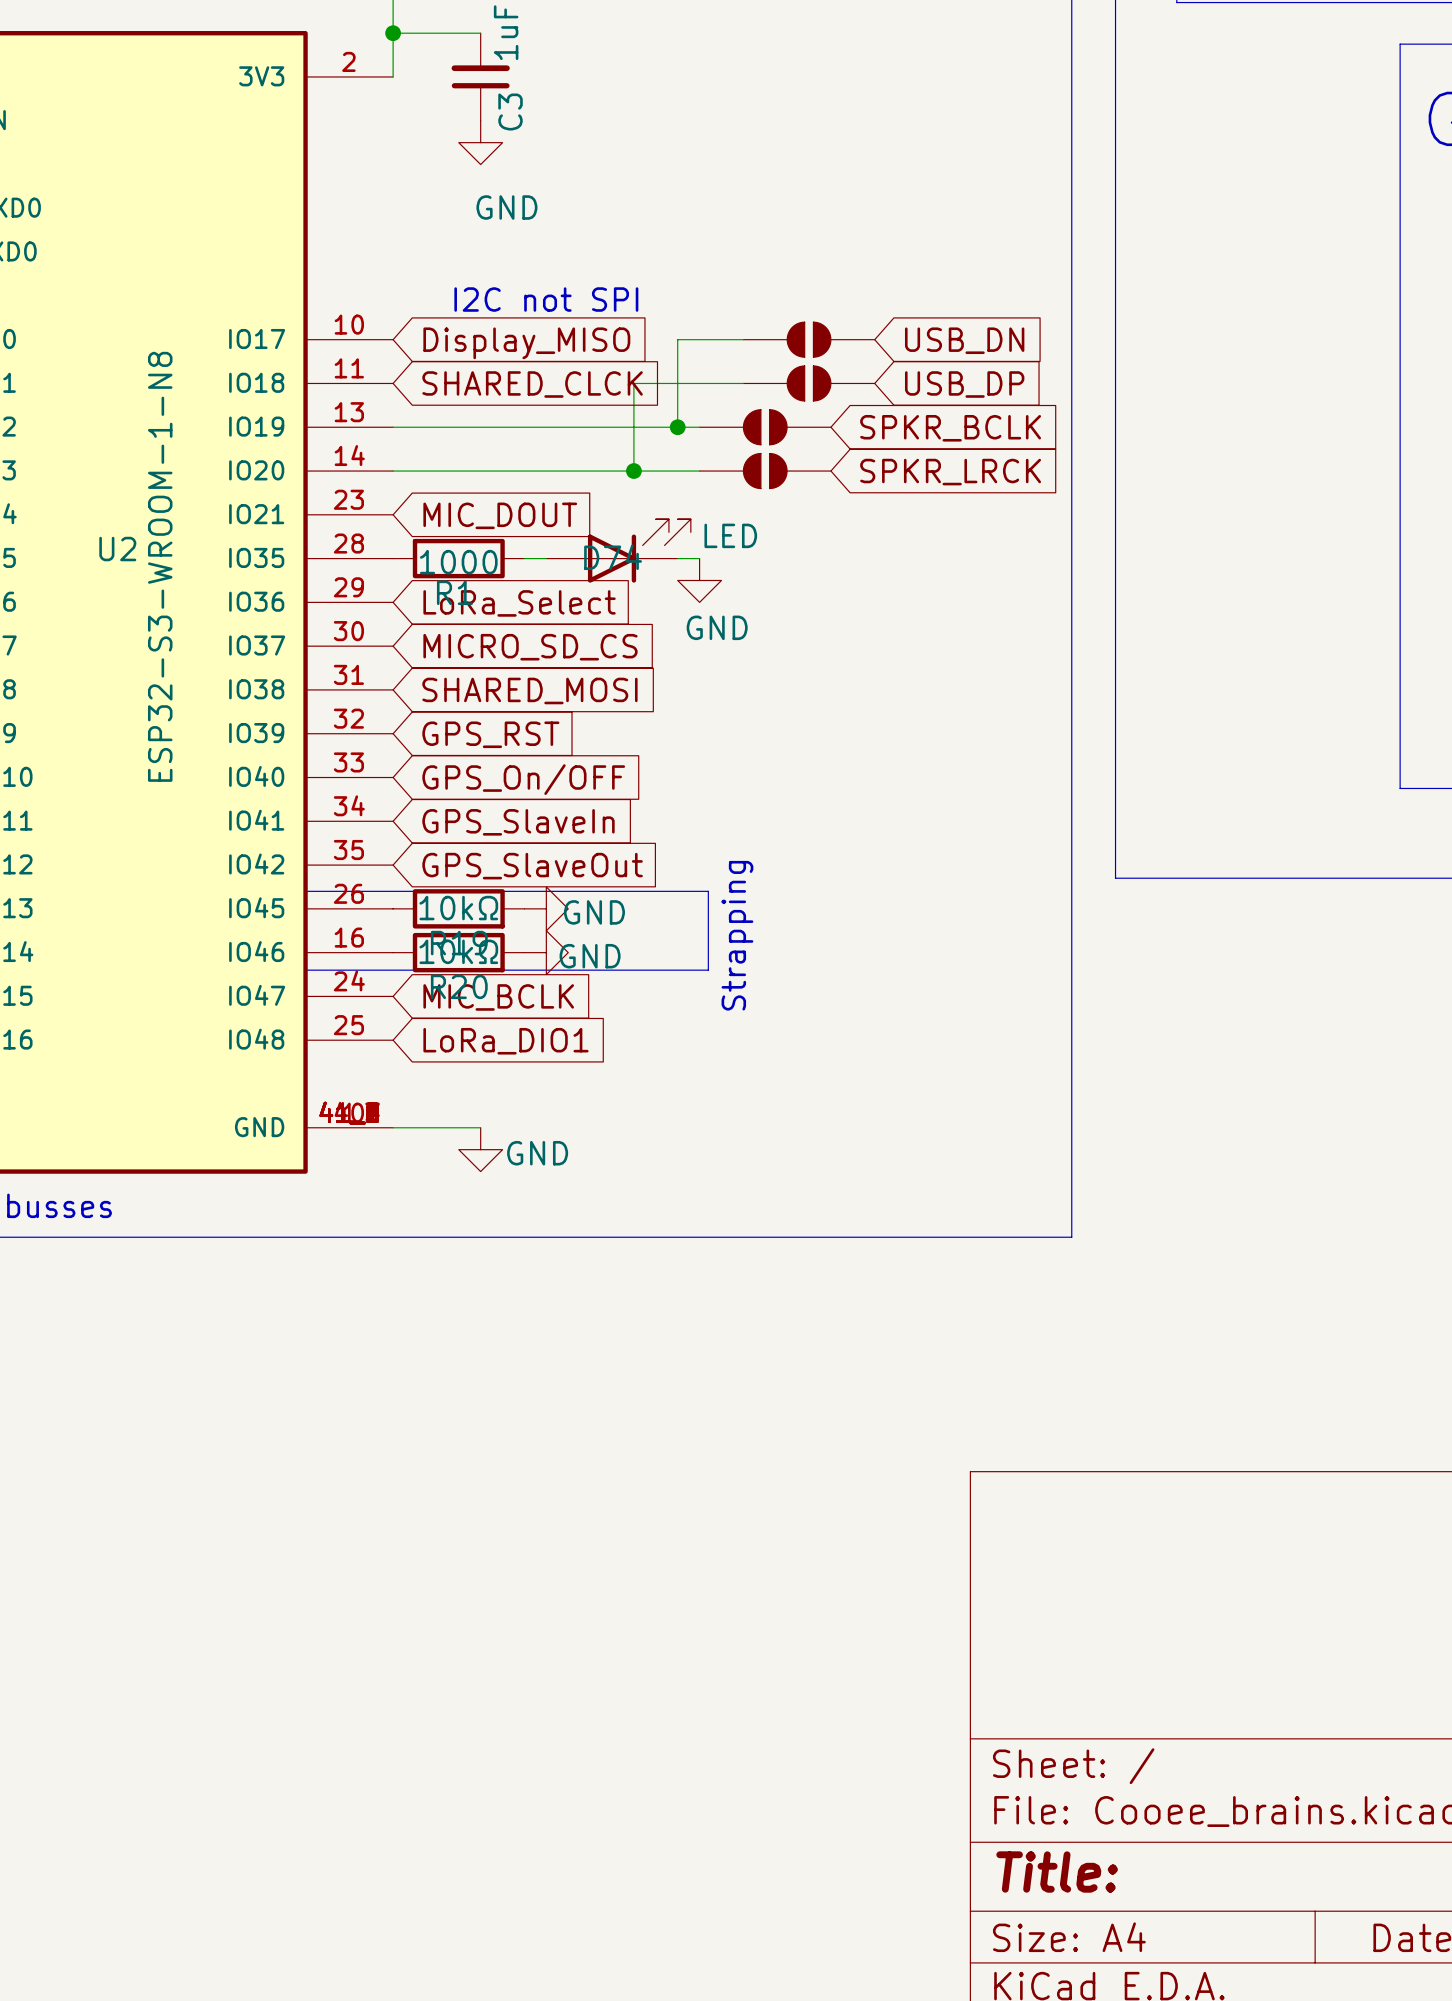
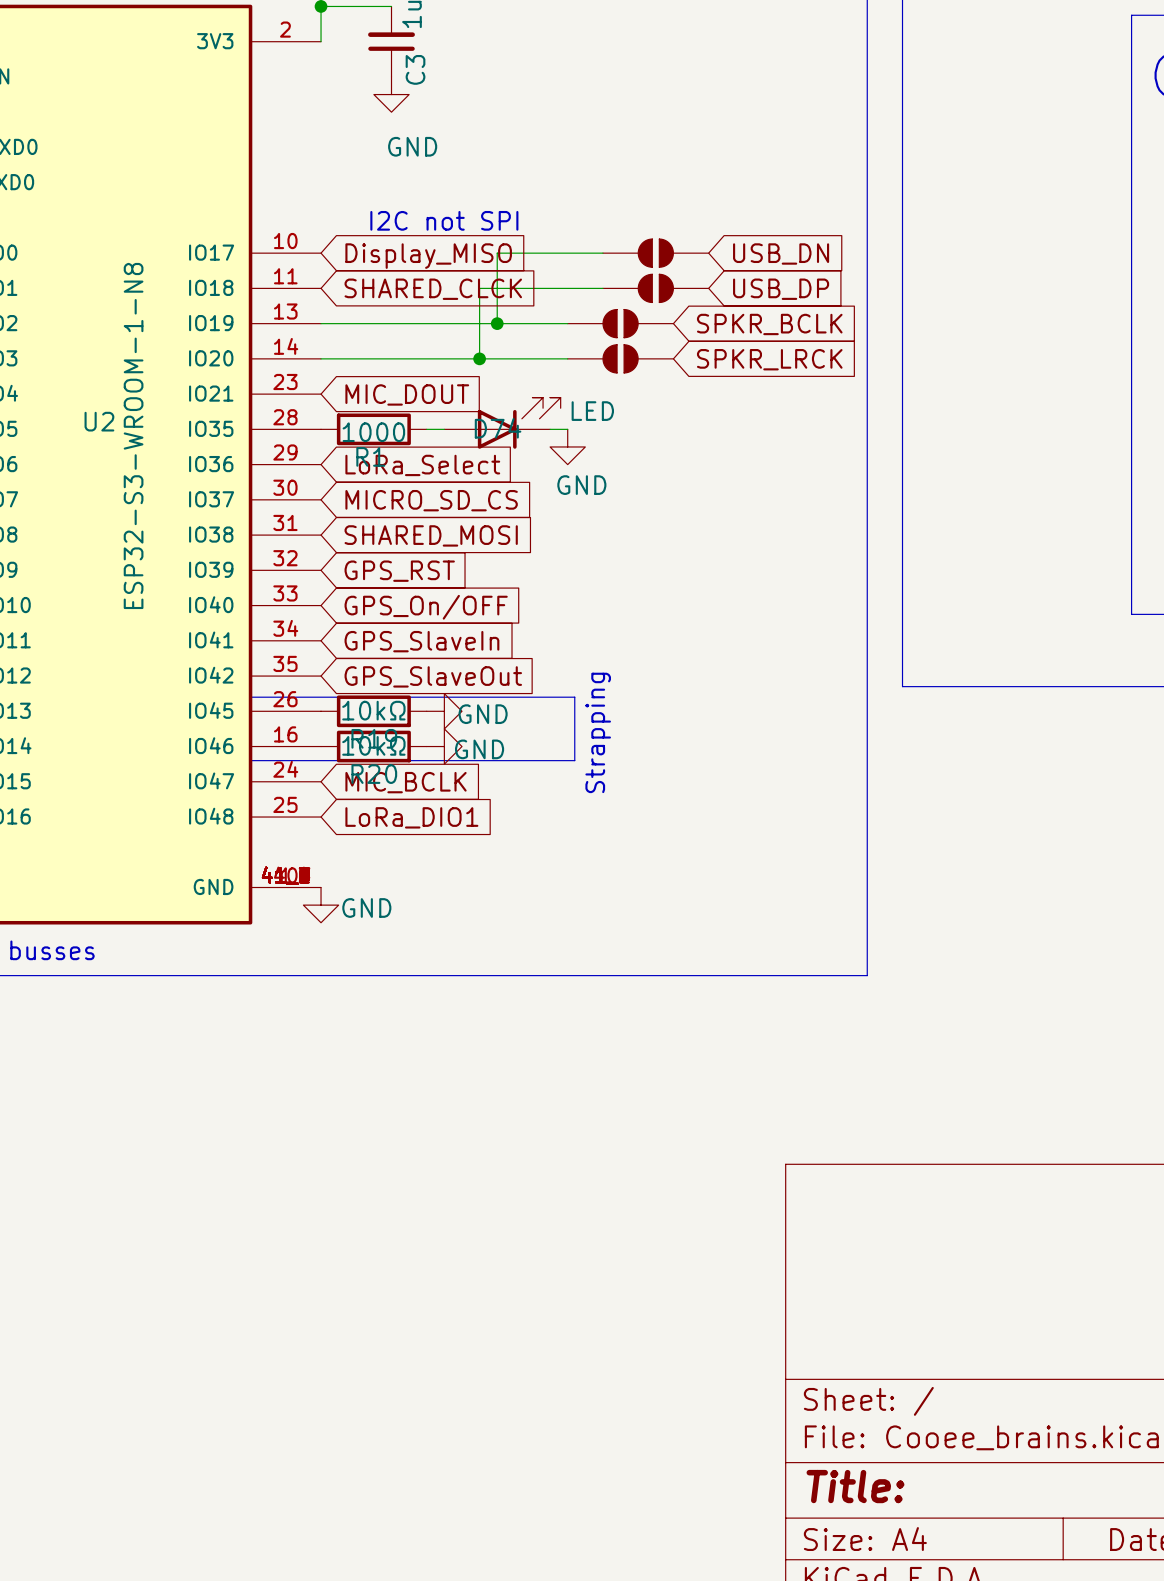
wire: (677, 339) (677, 427) -> (550, 253) (497, 253) (497, 323)
wire: (633, 383) (633, 471) -> (514, 288) (479, 288) (479, 358)
junction: none -> (497, 323)
junction: (677, 427) -> none
junction: none -> (479, 358)
junction: (633, 471) -> none
wire: (393, 1127) (480, 1127) -> none
power symbol position: GND (480, 1149) -> GND (321, 905)

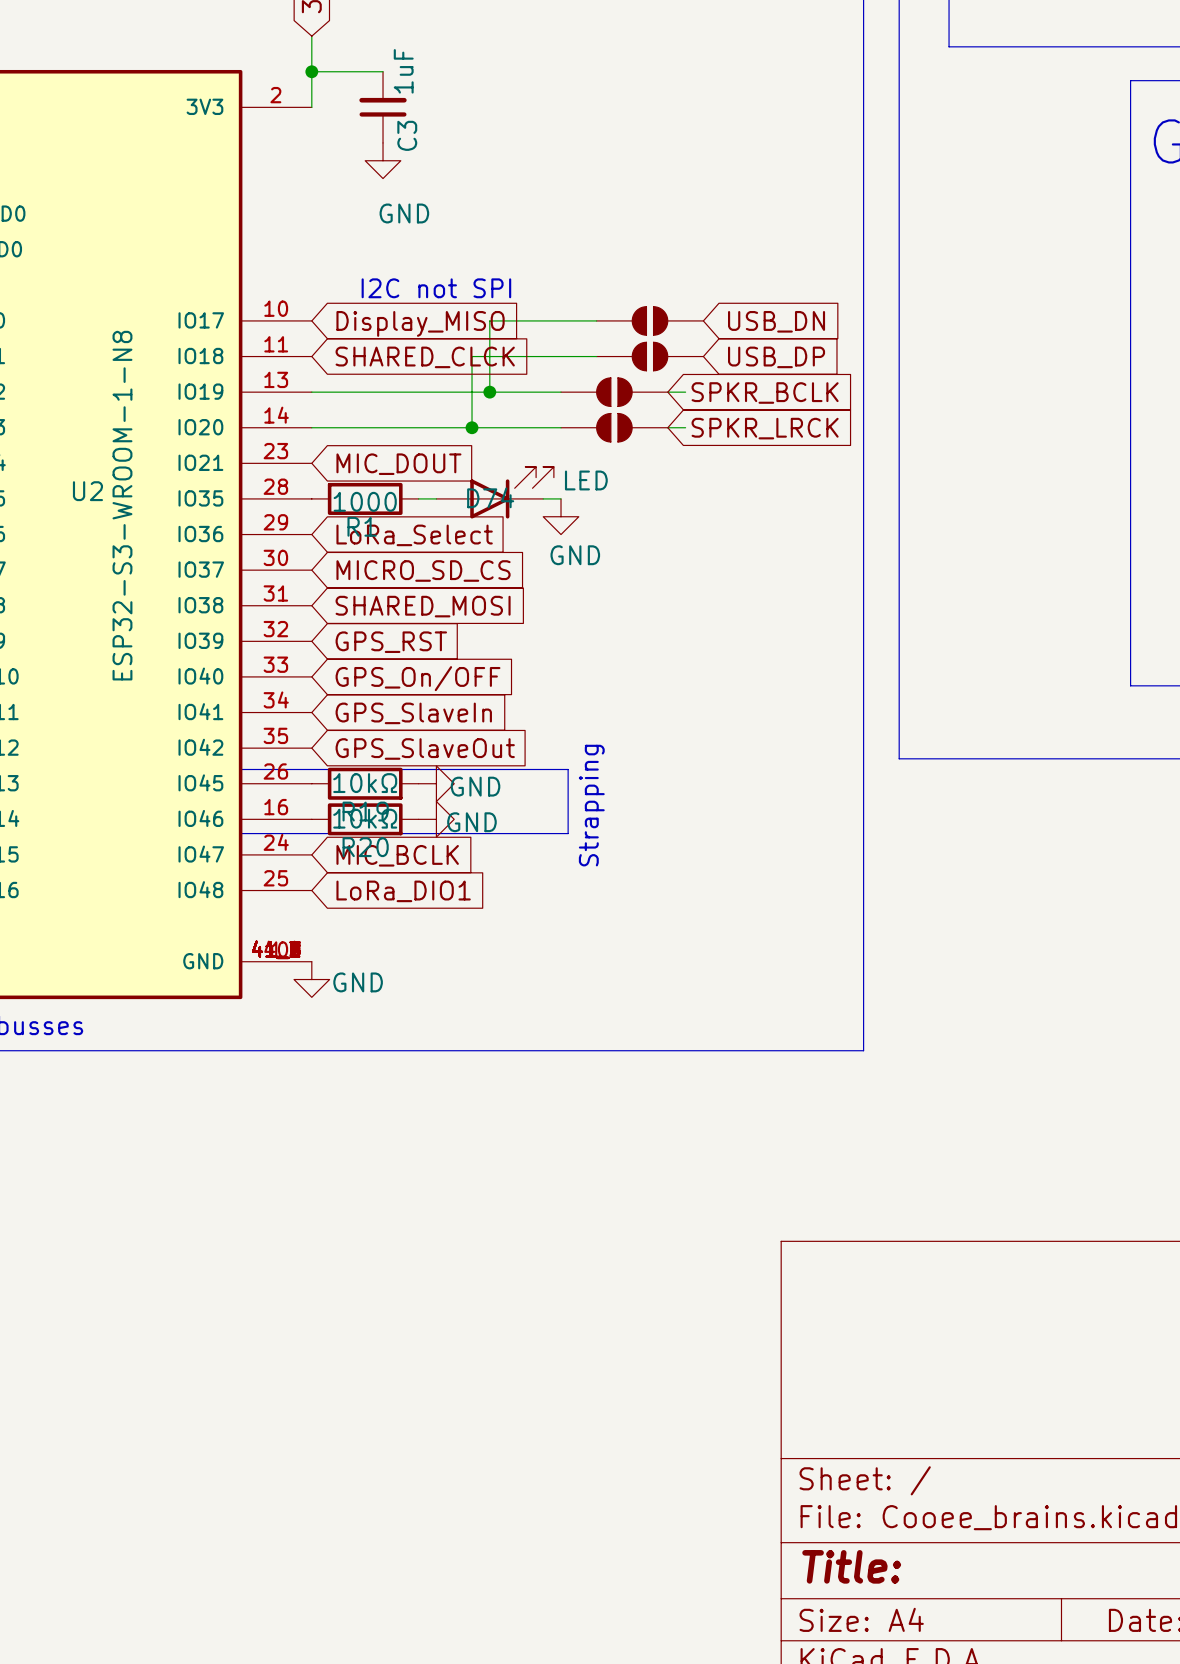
wire: none -> (667, 392) (685, 392)
wire: none -> (667, 427) (685, 427)

